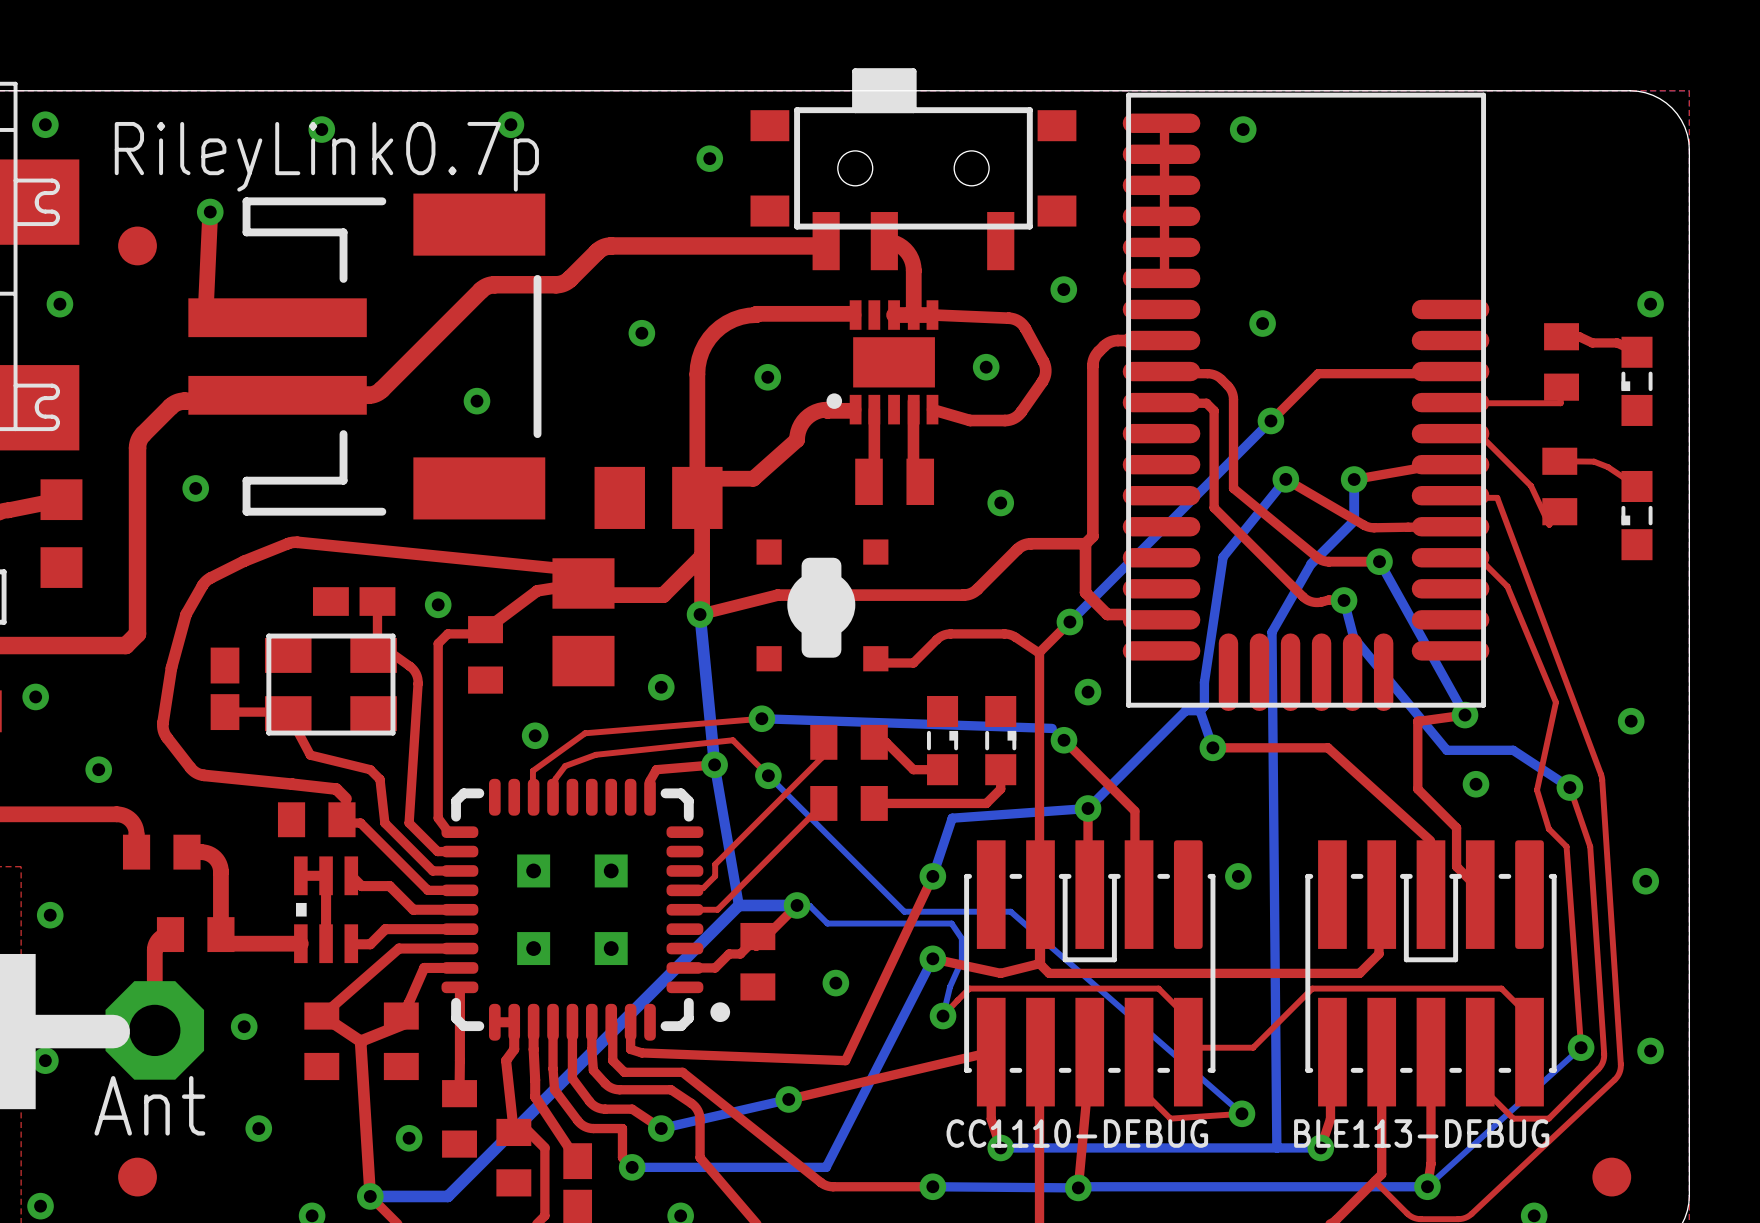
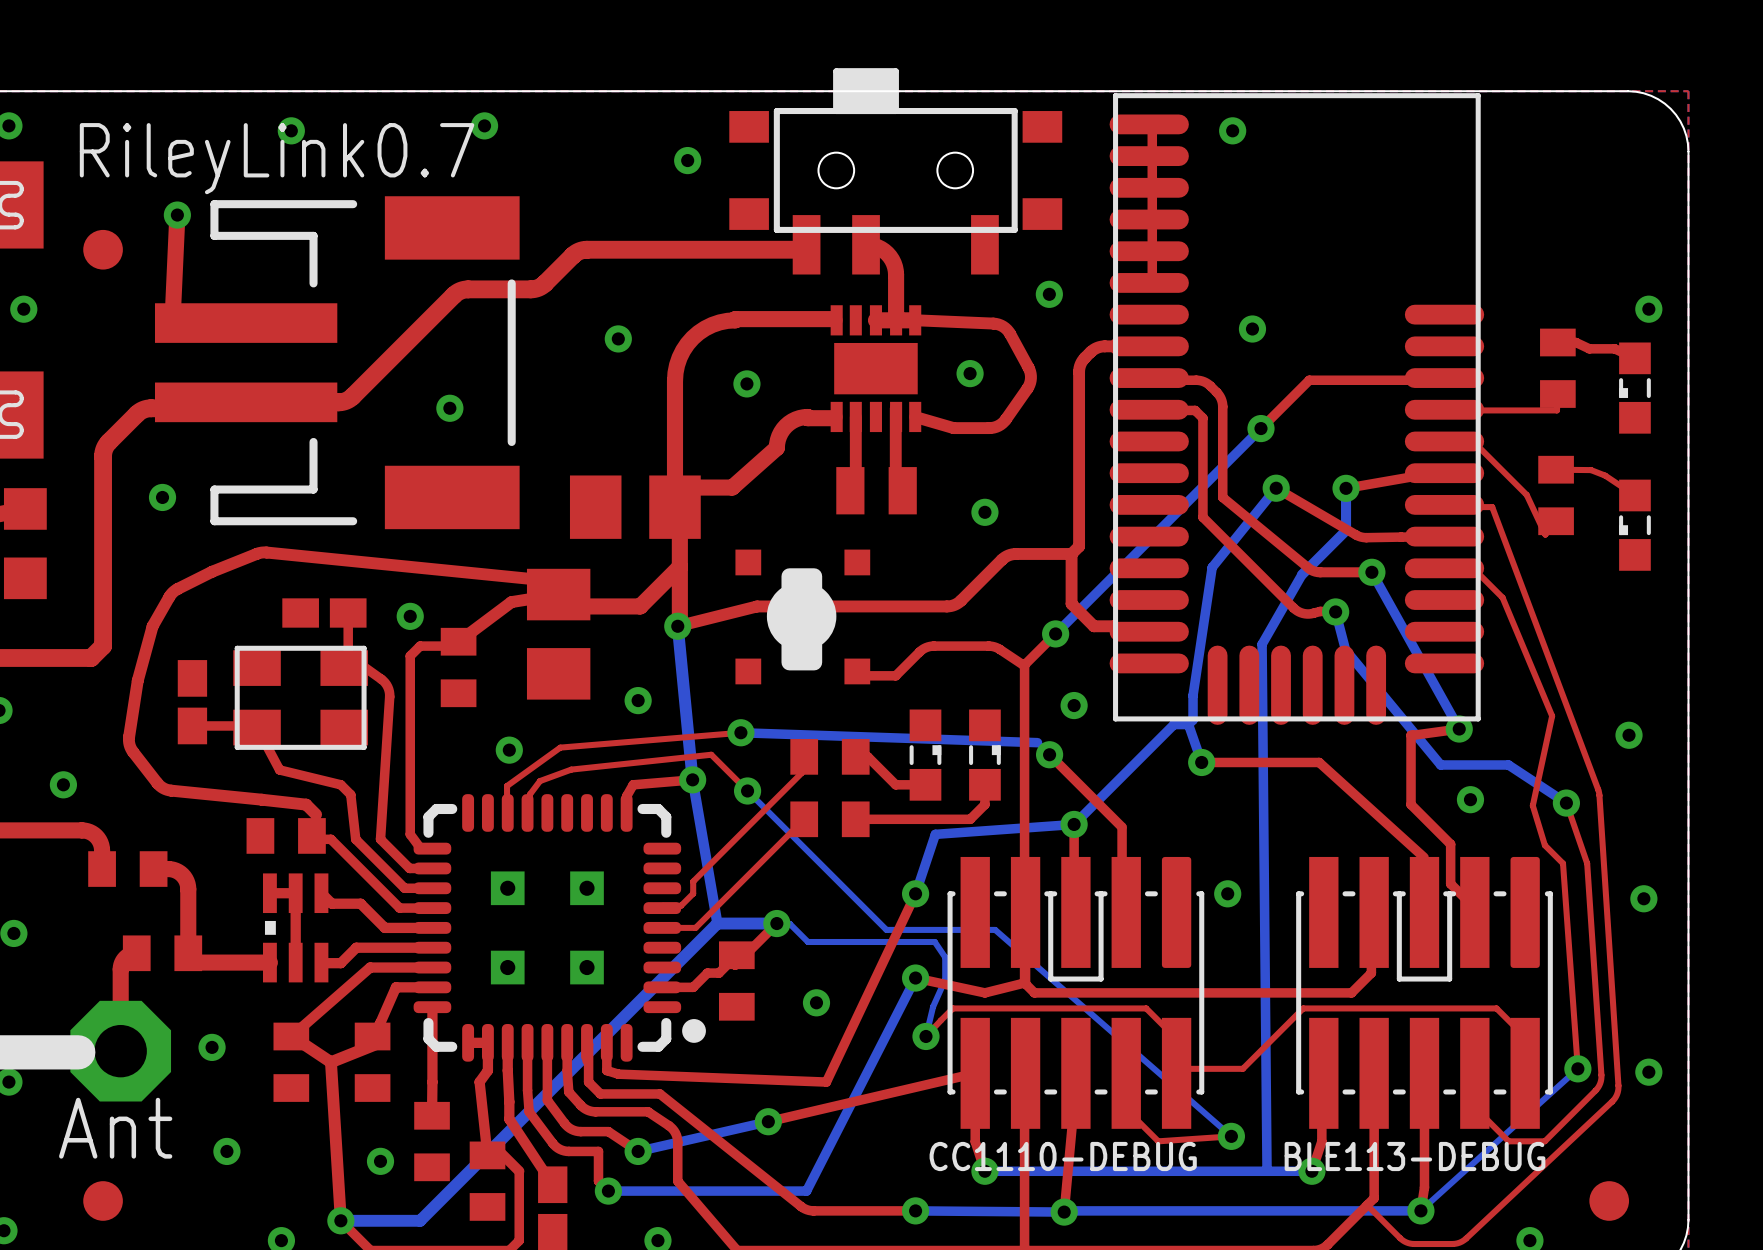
text: RileyLink0.7p (326, 156) -> RileyLink0.7 (277, 158)
part footprint: [826, 300, 939, 425] -> [830, 305, 922, 433]
part footprint: [441, 778, 731, 1041] -> [413, 794, 706, 1062]

